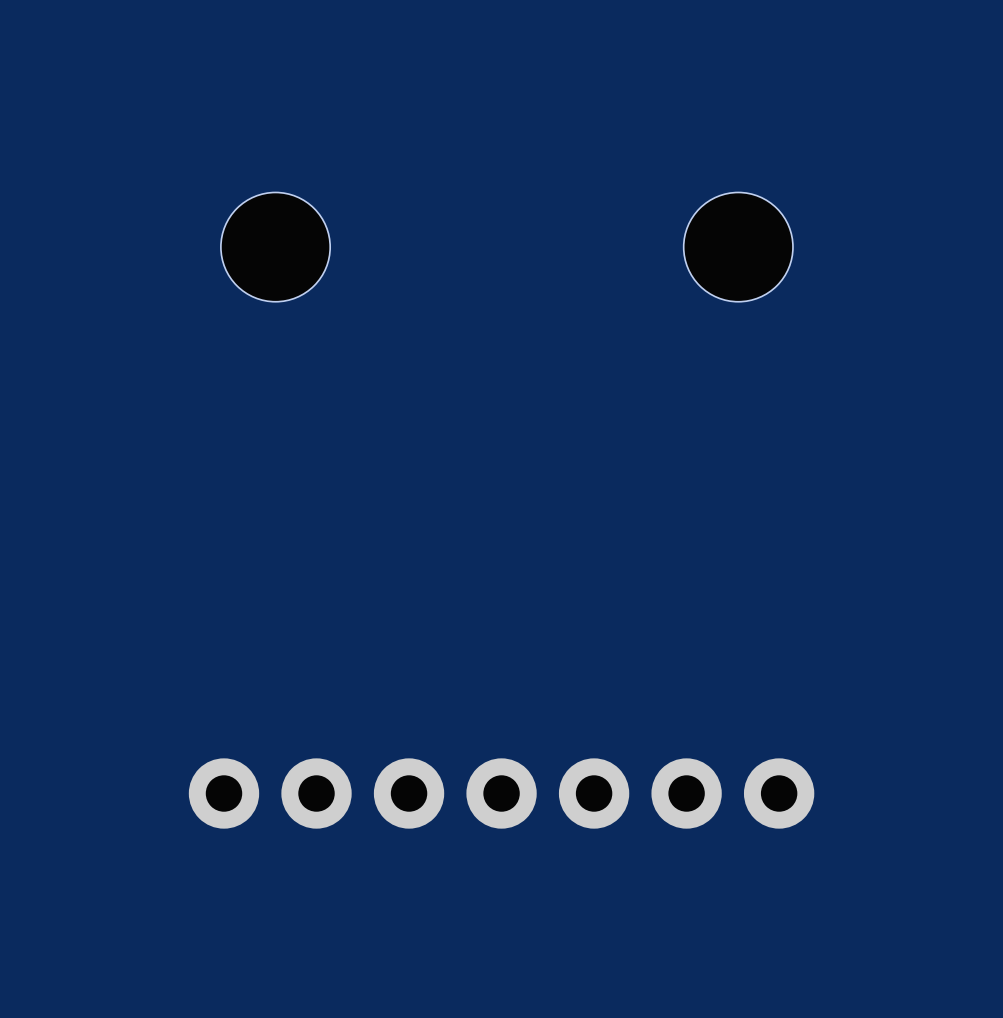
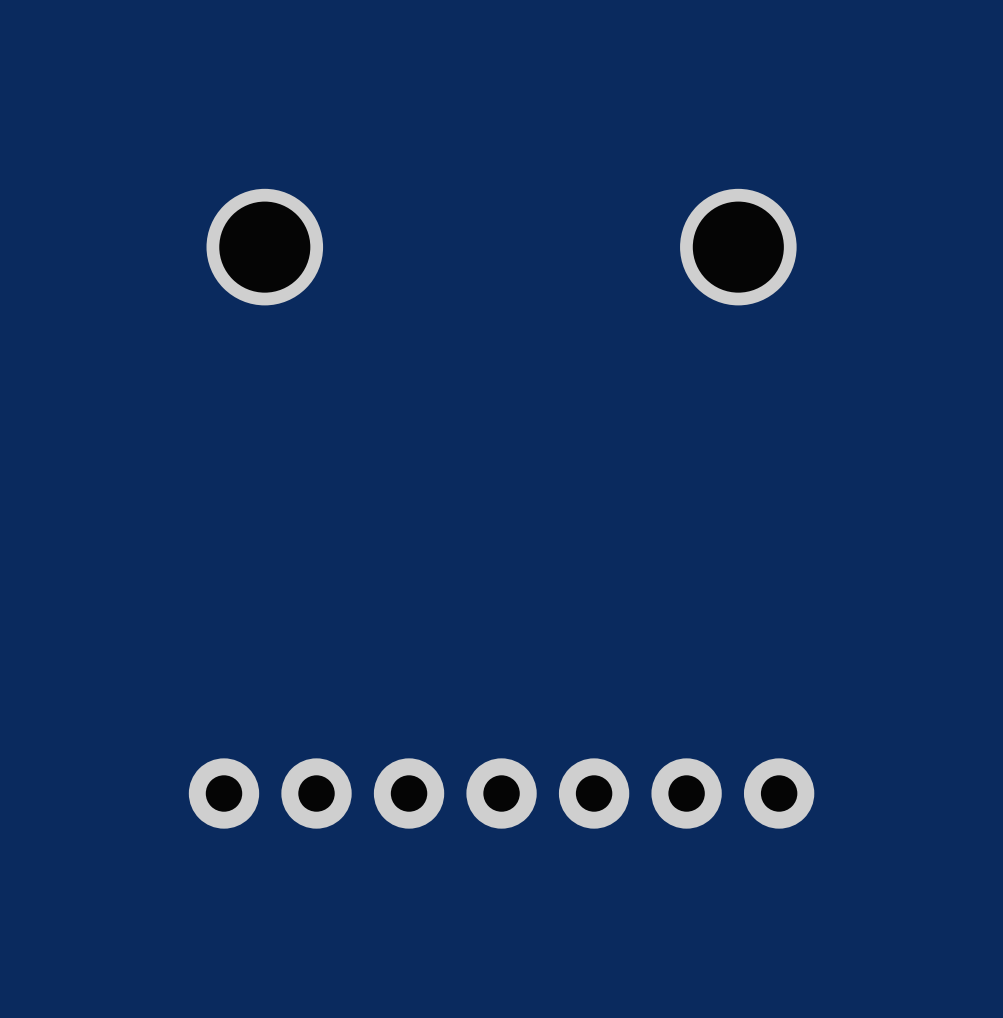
part footprint: [220, 192, 331, 302] -> [206, 188, 324, 306]
part footprint: [683, 192, 793, 302] -> [680, 188, 797, 306]

